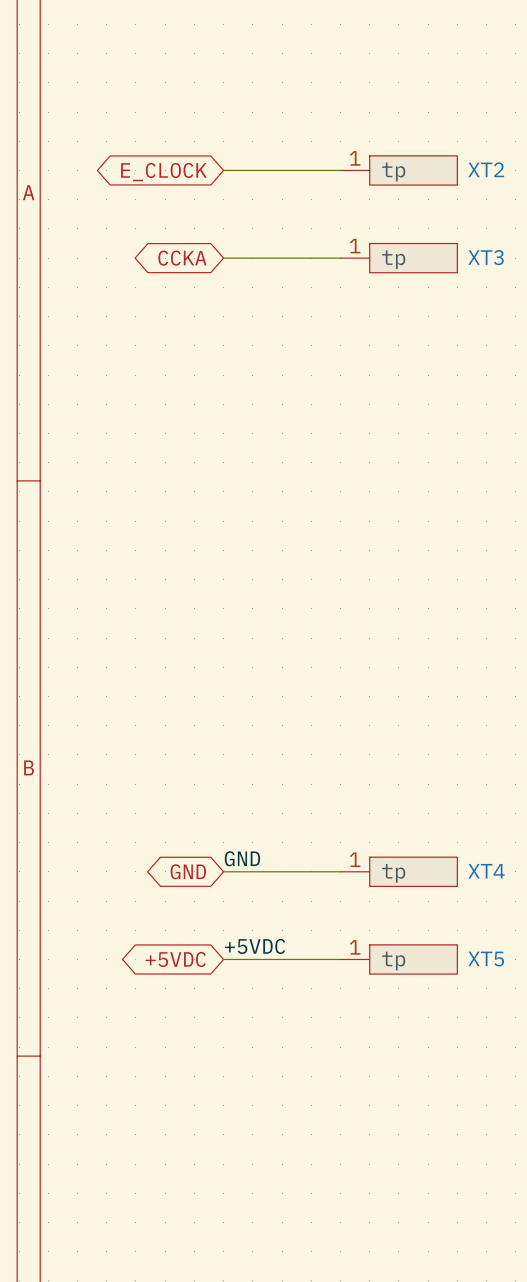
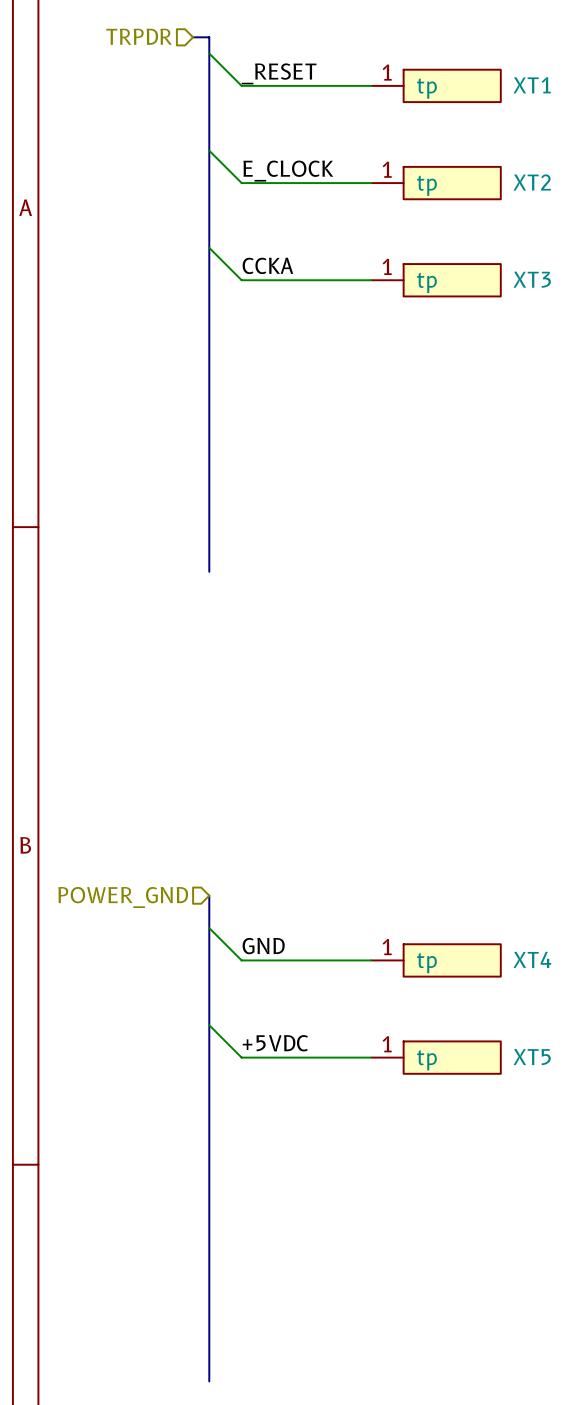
hierarchical label: none -> TRPDR (139, 36)
bus: none -> (193, 37) (209, 37) (209, 571)
wire: none -> (209, 53) (241, 85) (371, 85)
label: none -> _RESET (279, 73)
XT1: none -> (436, 85)
wire: none -> (209, 150) (241, 183)
label: none -> E_CLOCK (288, 171)
global label: E_CLOCK (163, 172) -> none
wire: none -> (209, 247) (241, 280)
label: none -> CCKA (267, 265)
global label: CCKA (182, 258) -> none
bus: none -> (209, 895) (209, 1381)
hierarchical label: none -> POWER_GND (123, 897)
wire: none -> (209, 928) (241, 960)
global label: GND (188, 871) -> none
wire: none -> (209, 1025) (241, 1057)
global label: +5VDC (175, 959) -> none

